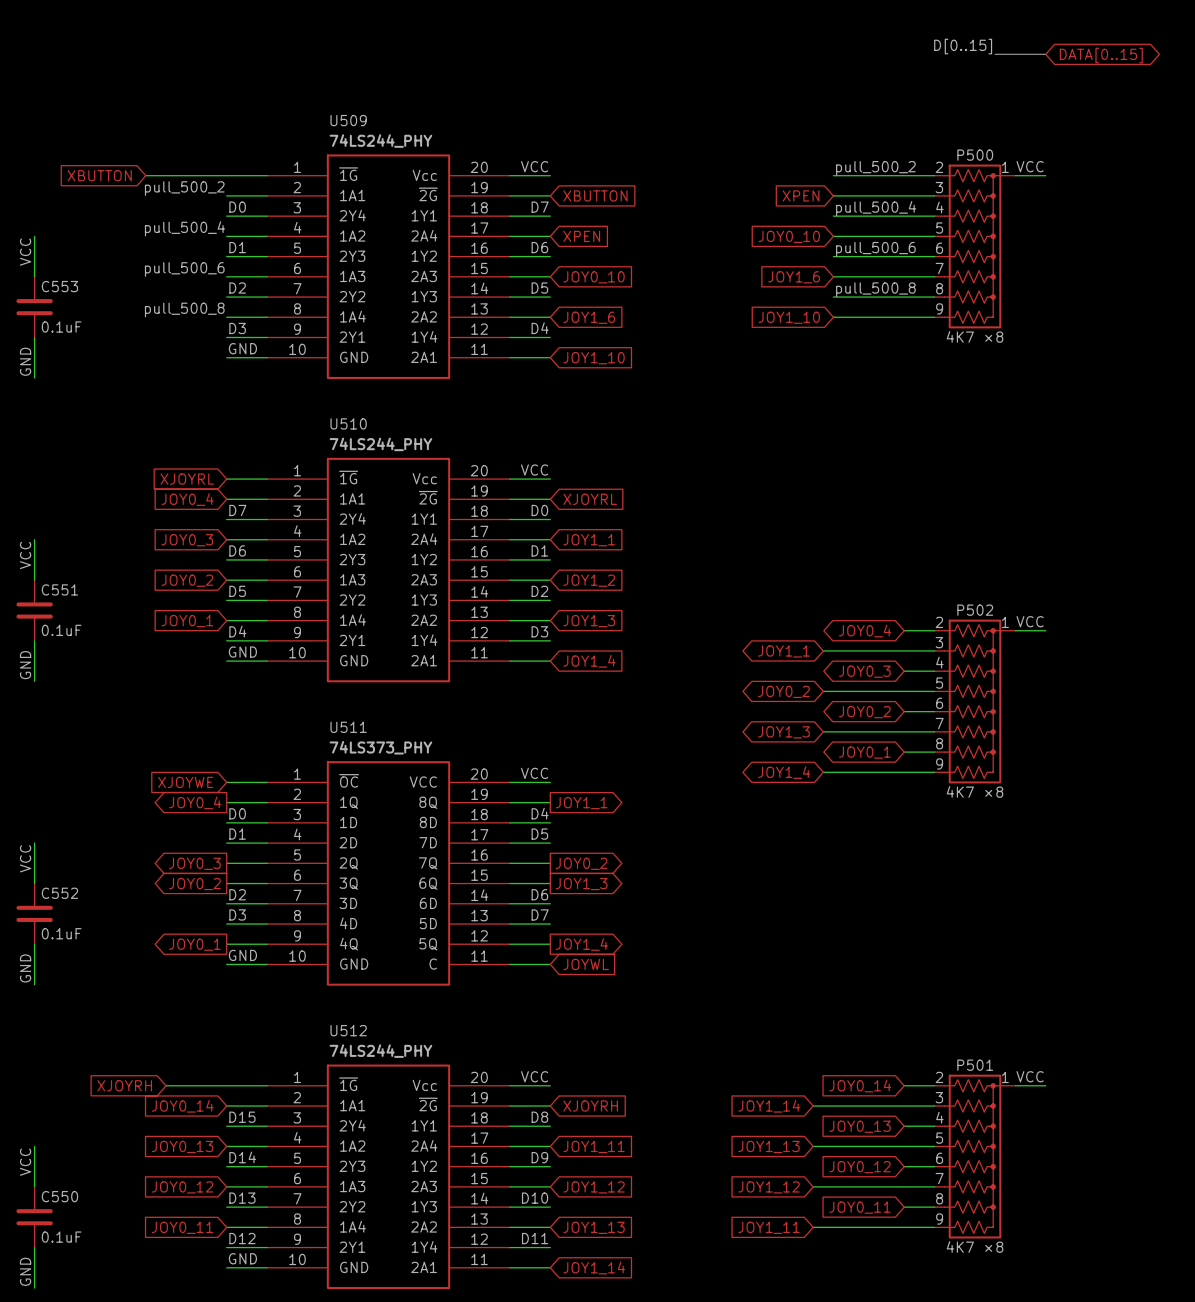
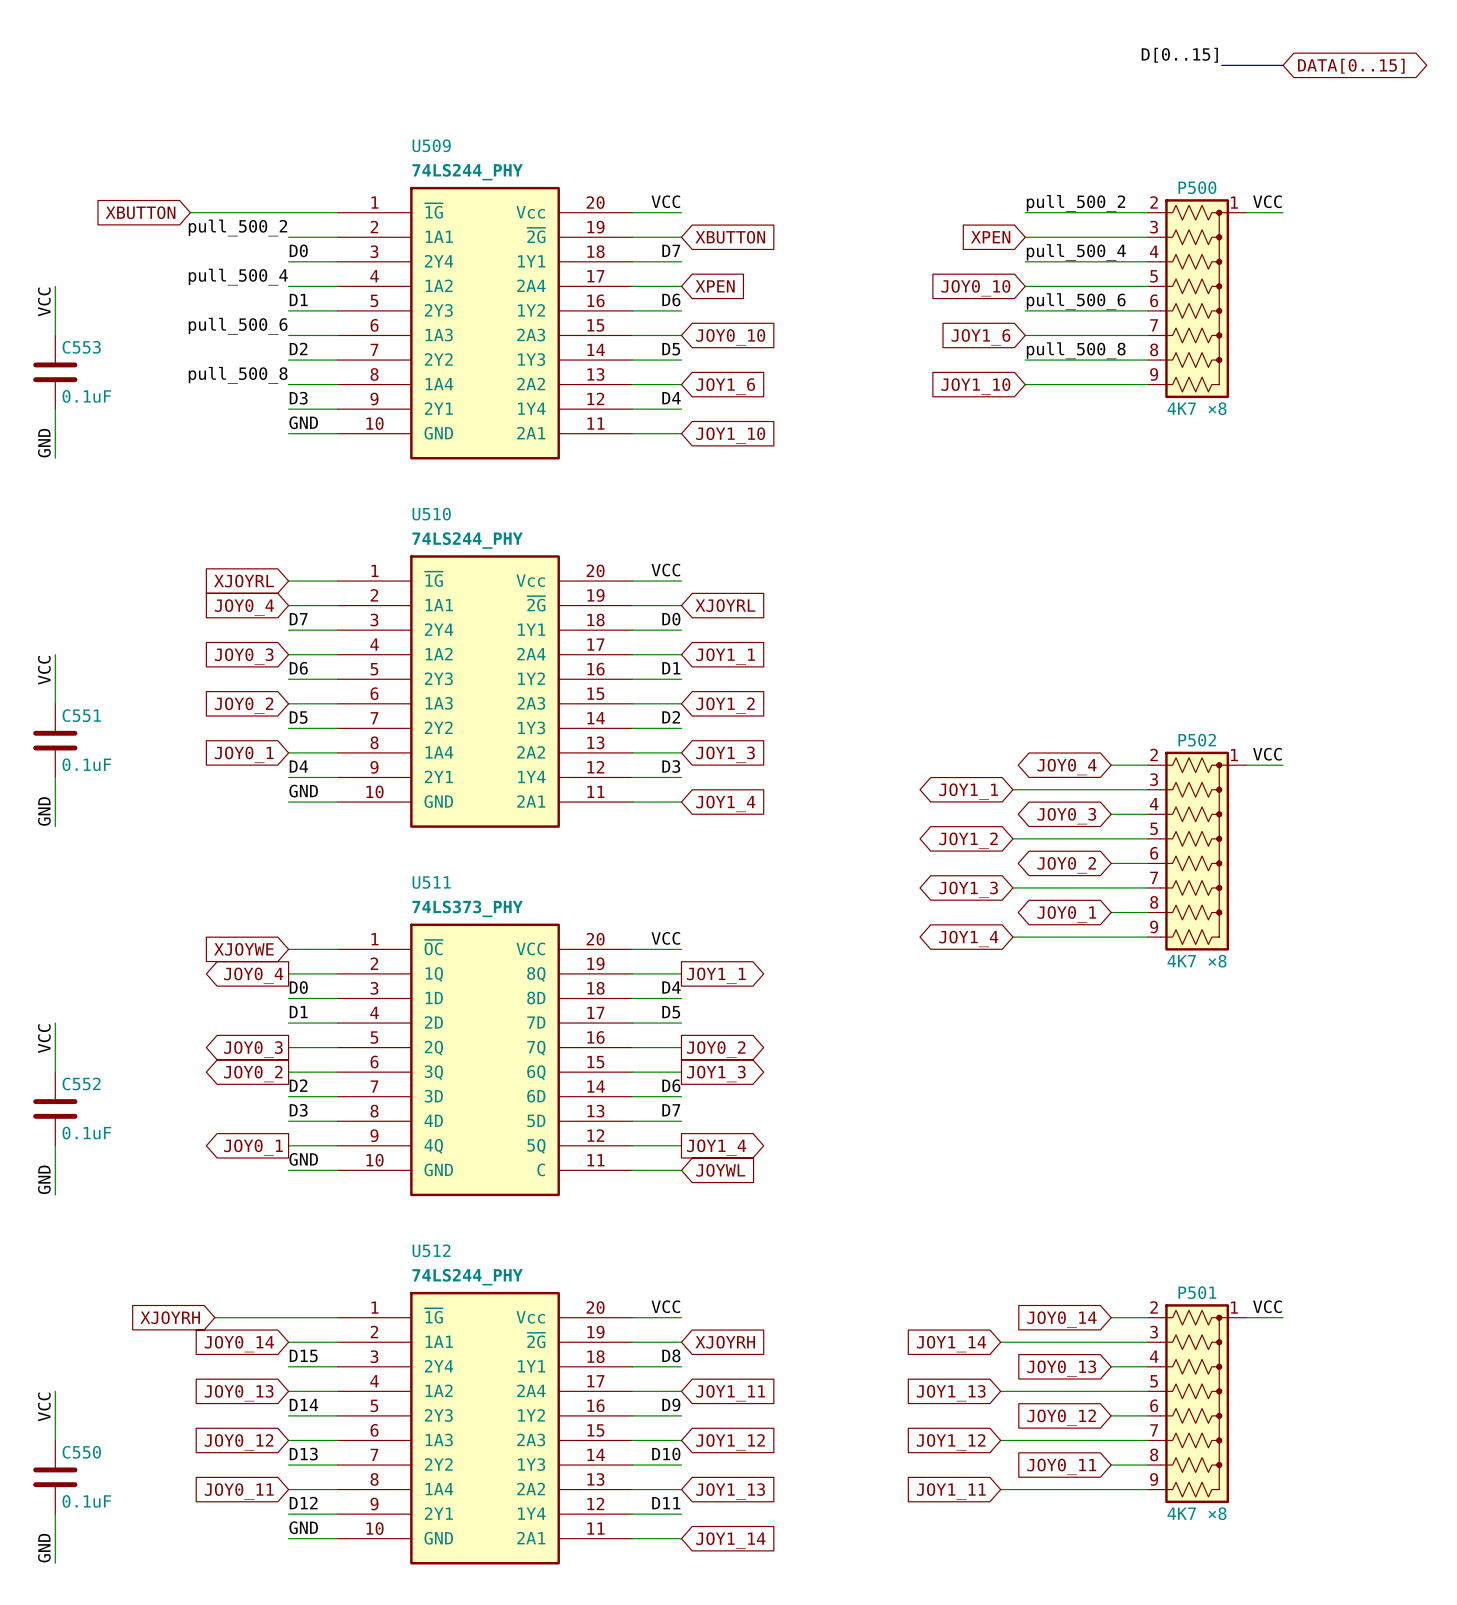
global label: JOY0_2 (783, 691) -> JOY1_2 (968, 840)

